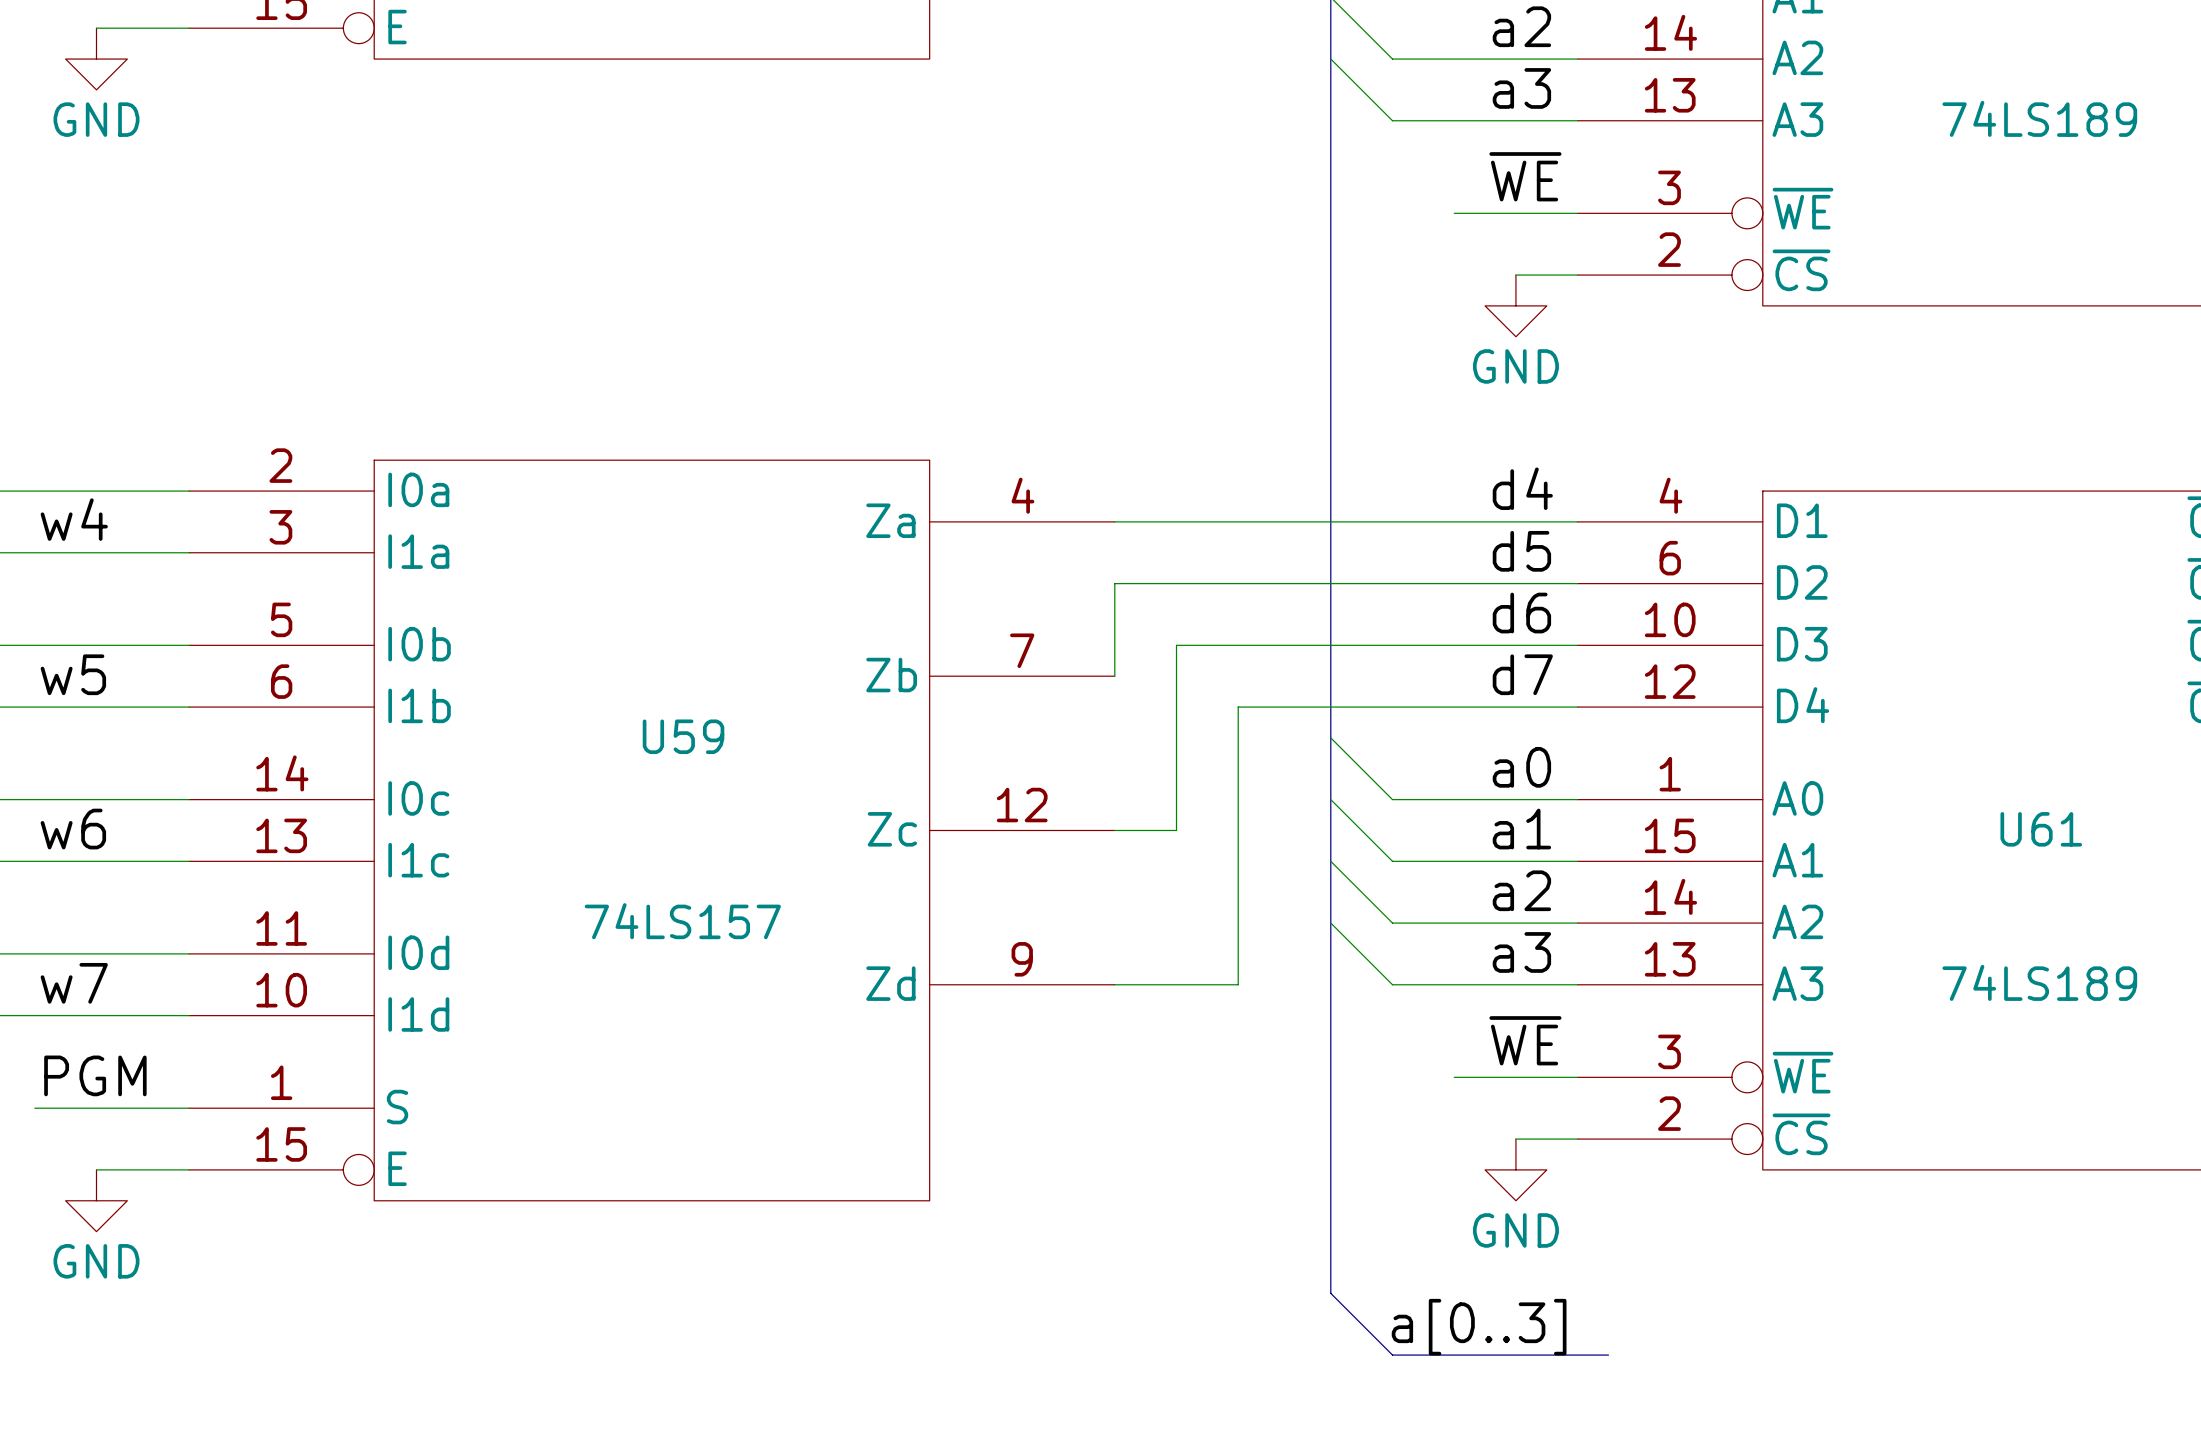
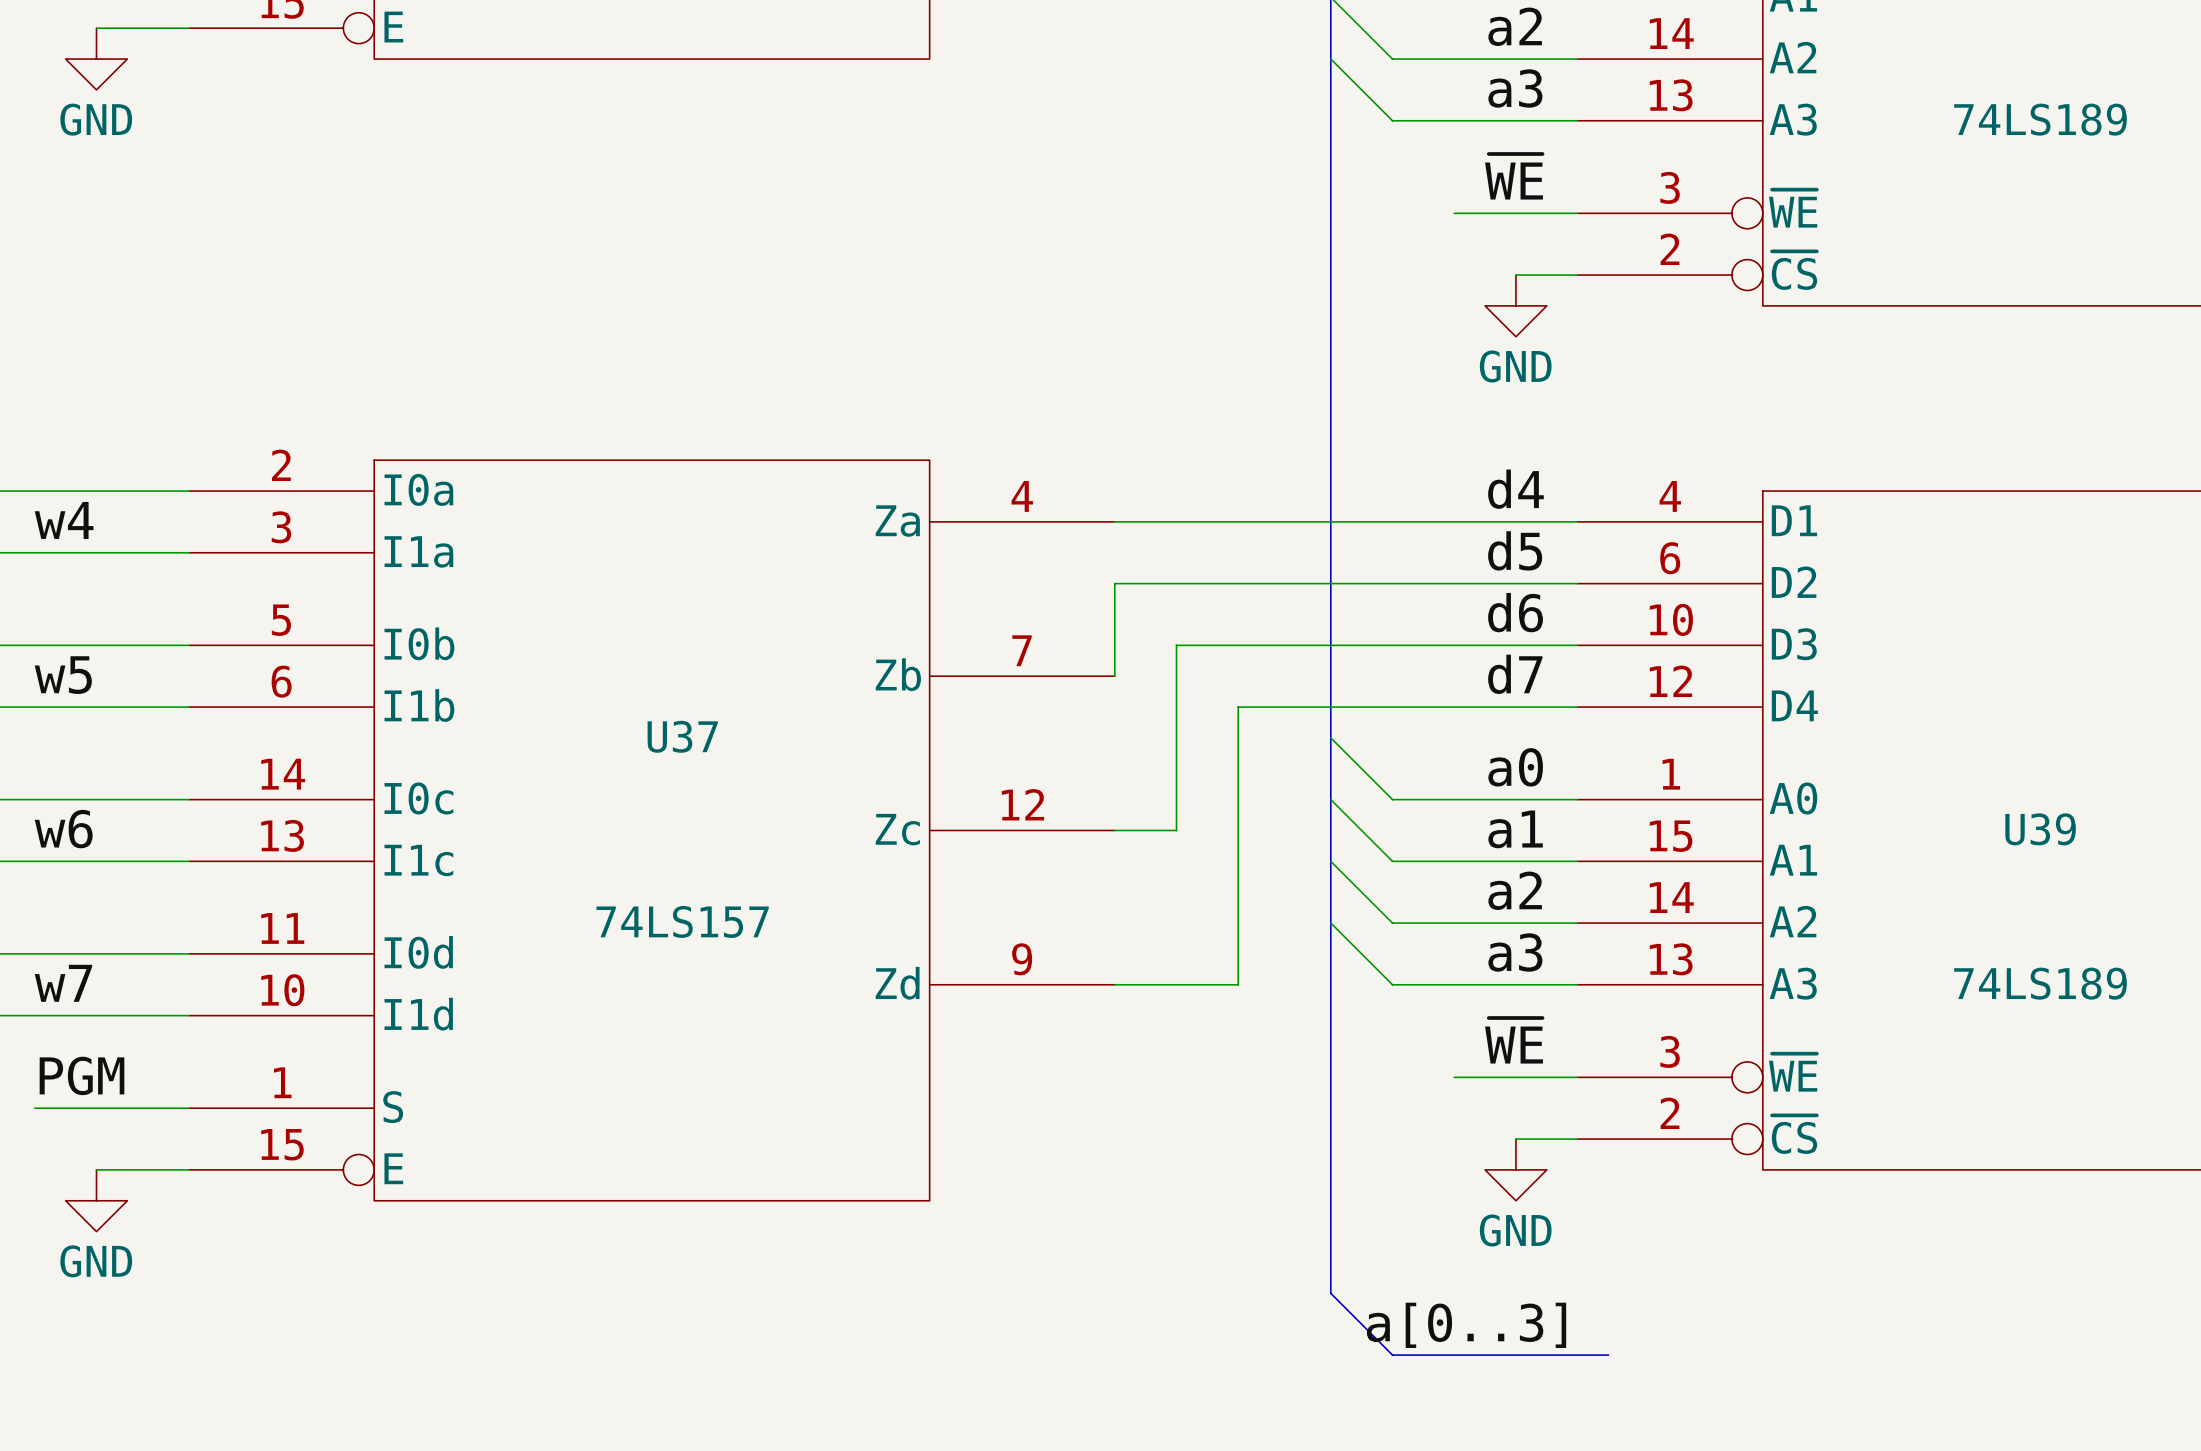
U59 name: U59 (683, 736) -> U37 (682, 736)
U61 name: U61 (2041, 829) -> U39 (2040, 829)

